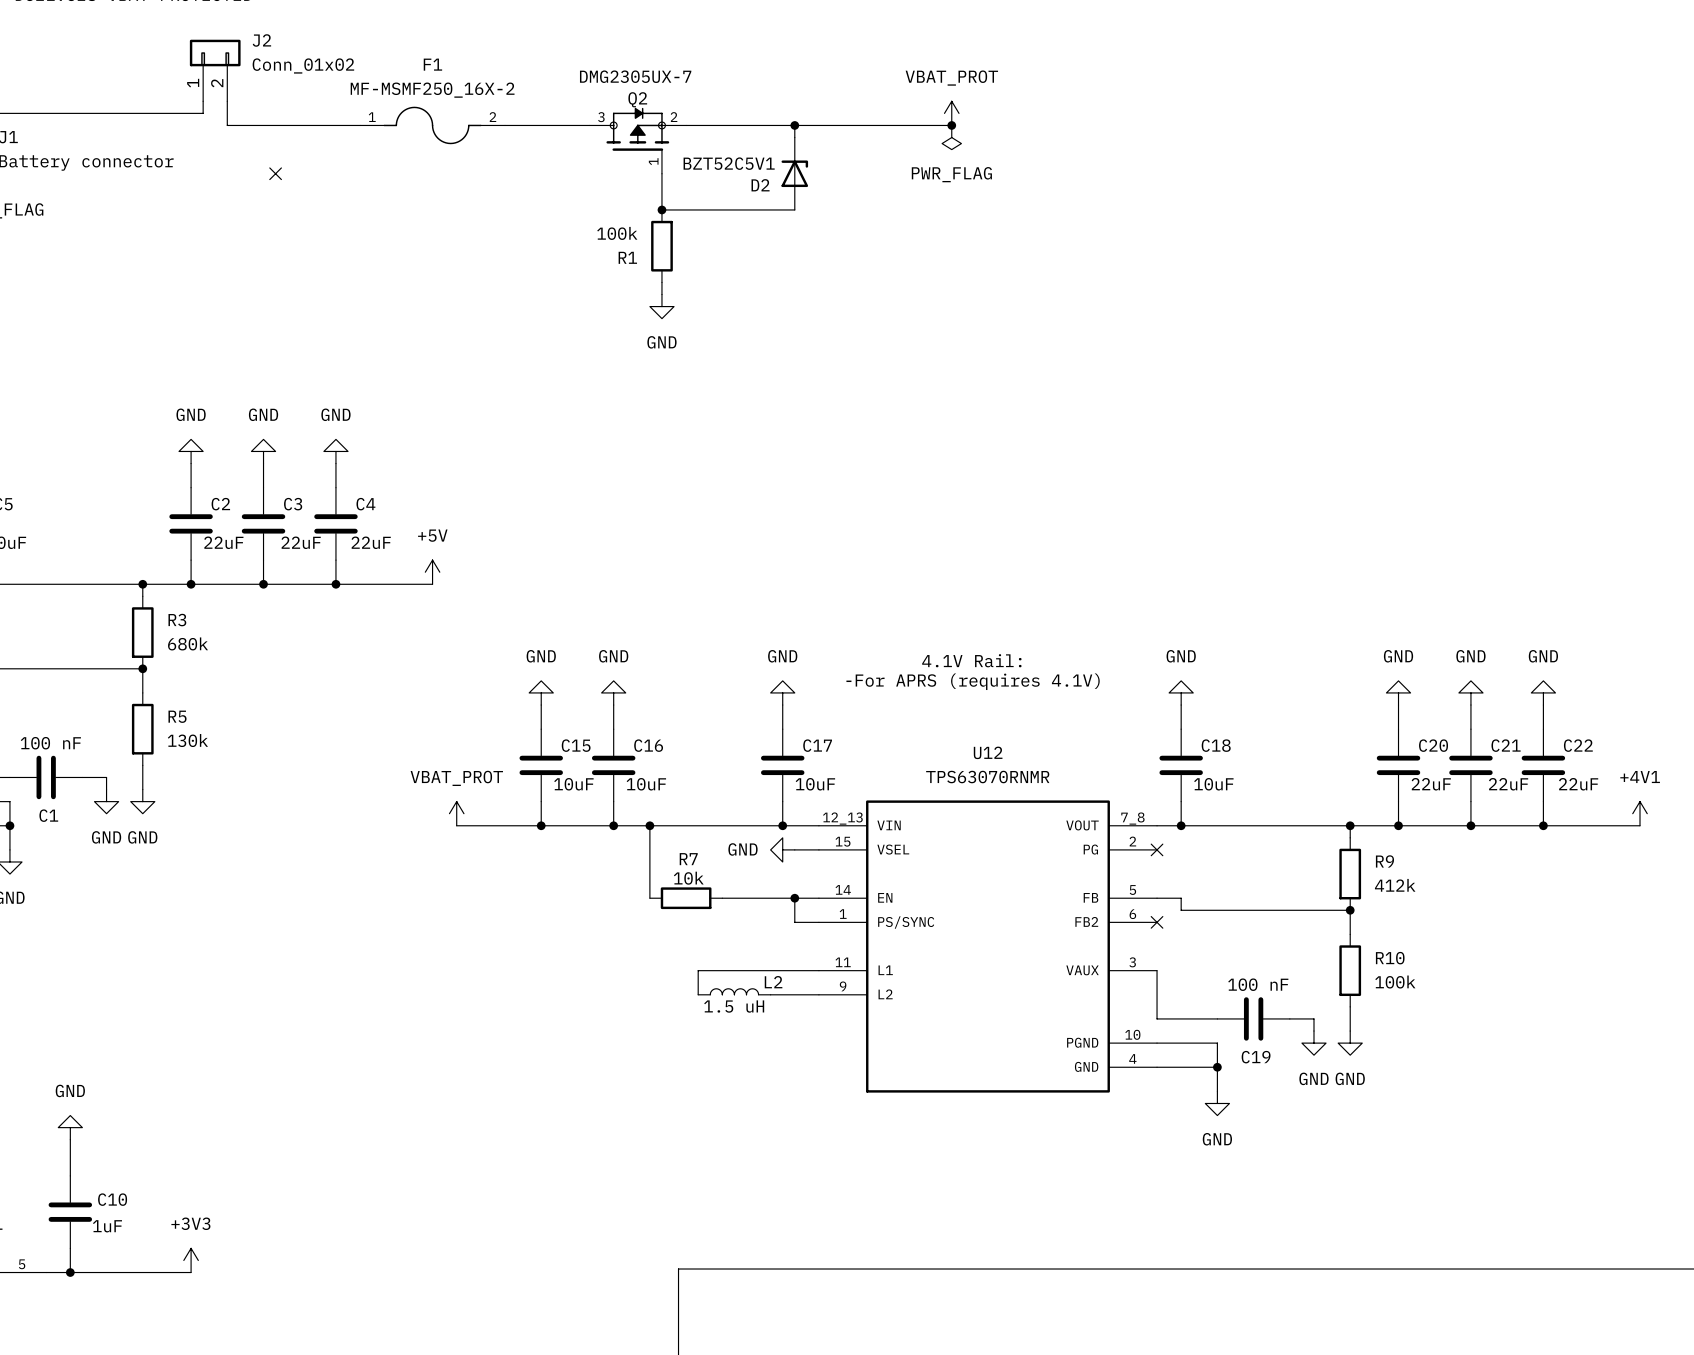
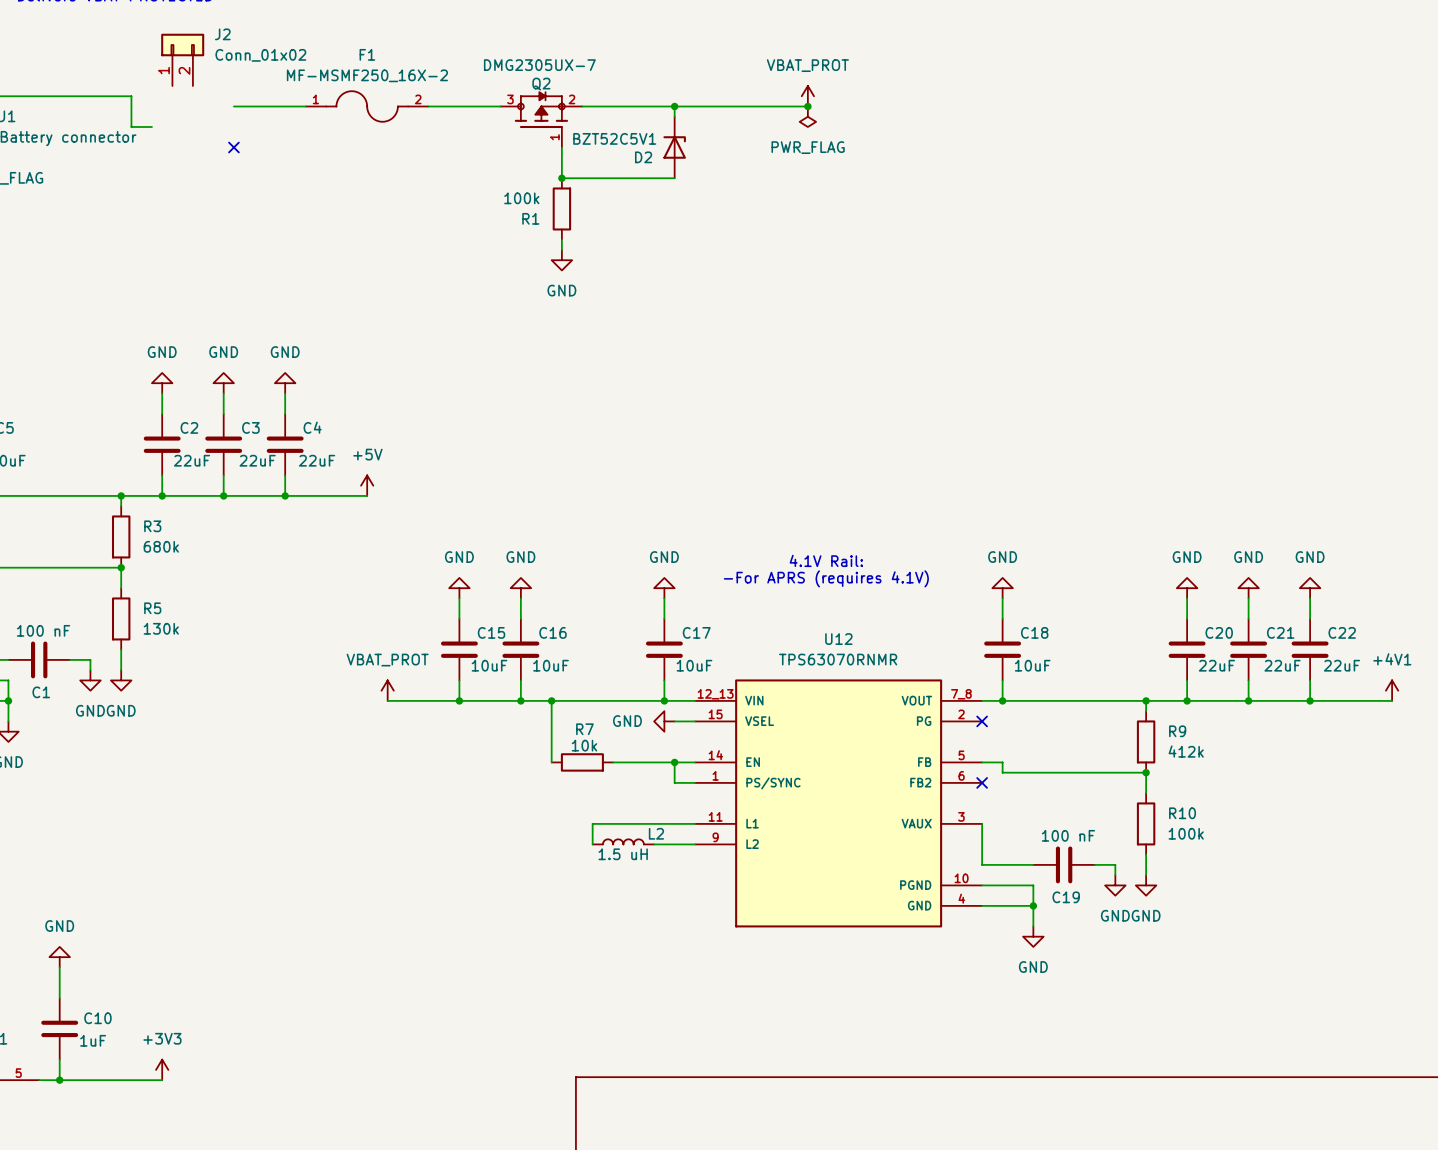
wire: (203, 101) (203, 113) (154, 113) -> (151, 126) (131, 126) (131, 96)
wire: (227, 101) (227, 125) (275, 125) -> none

